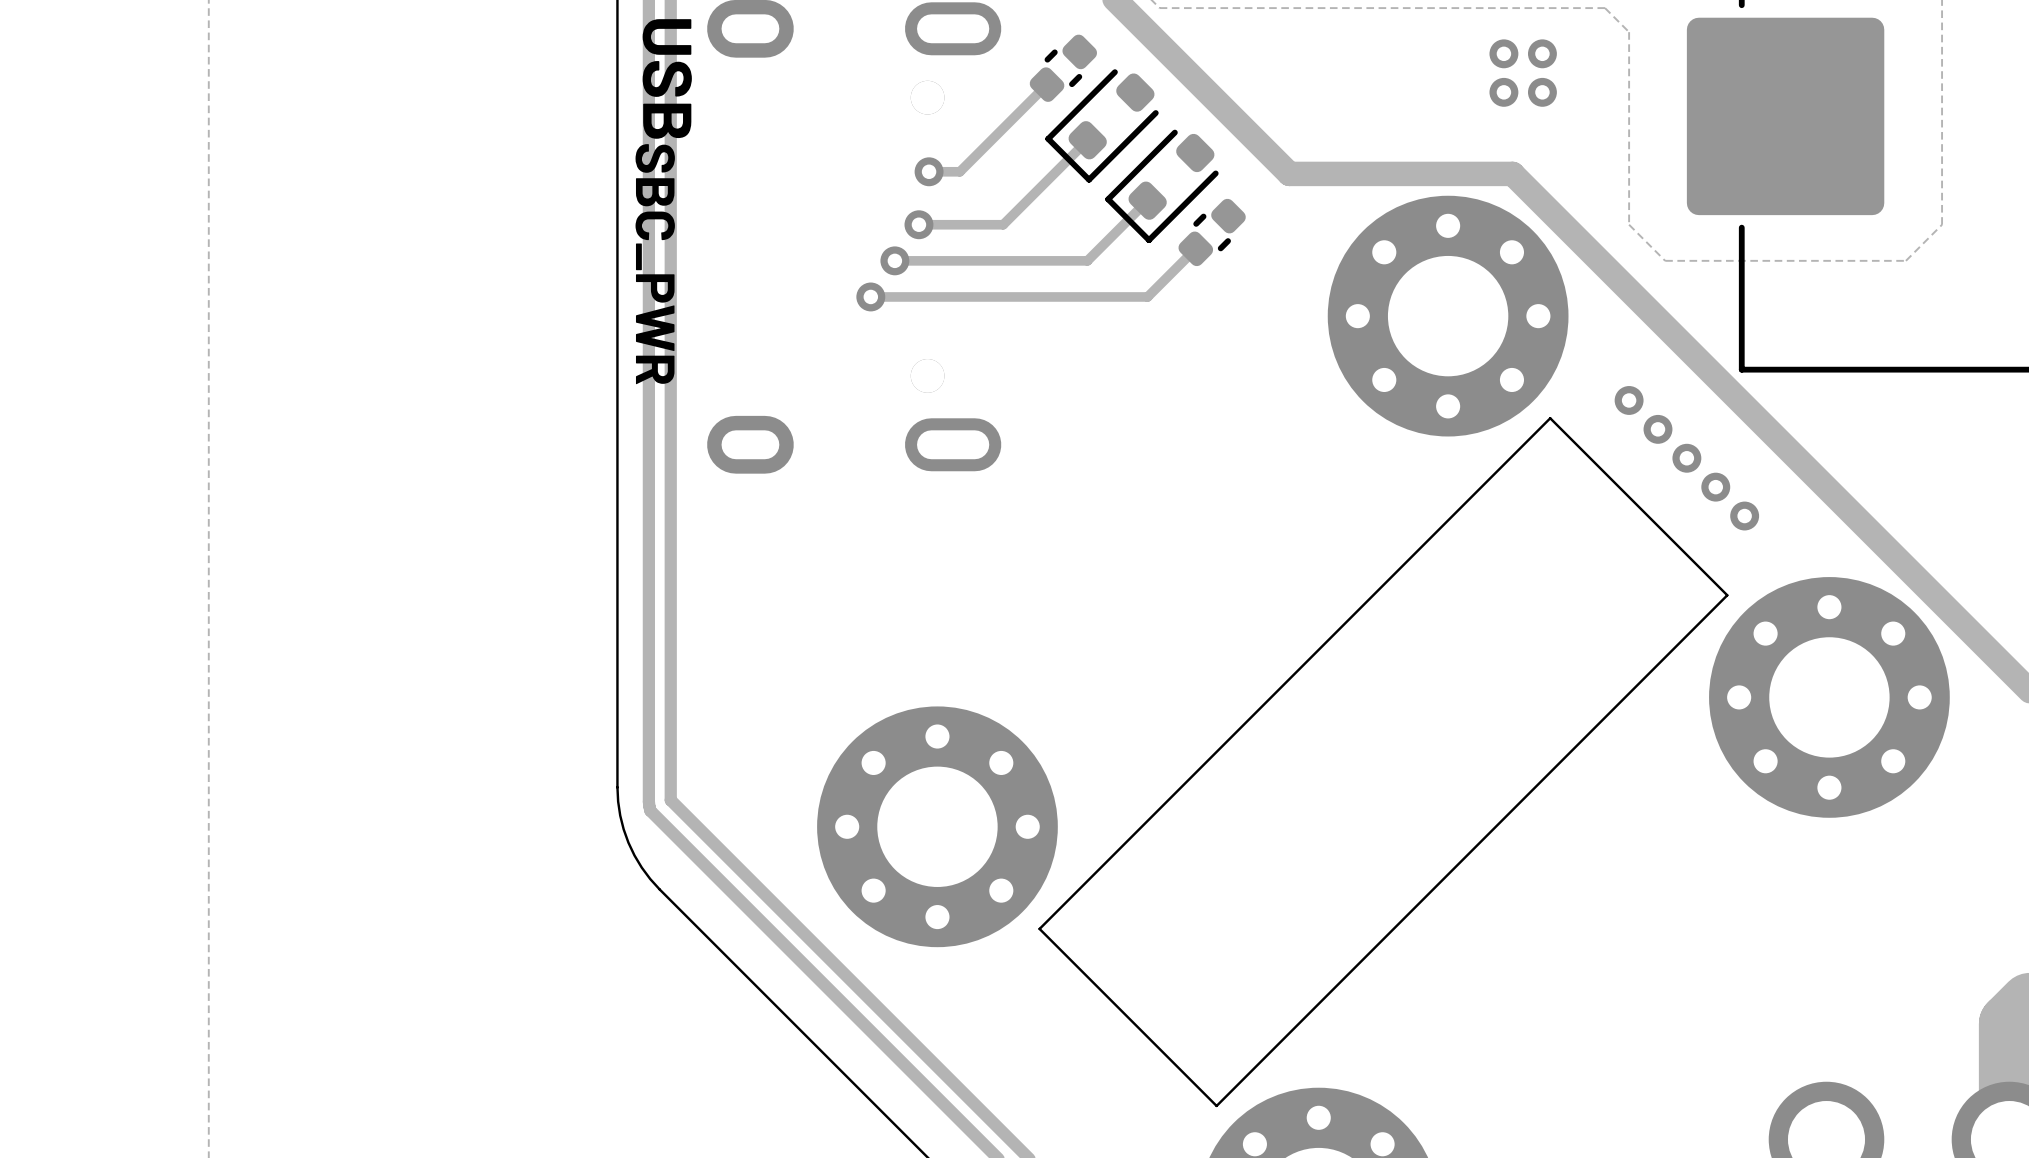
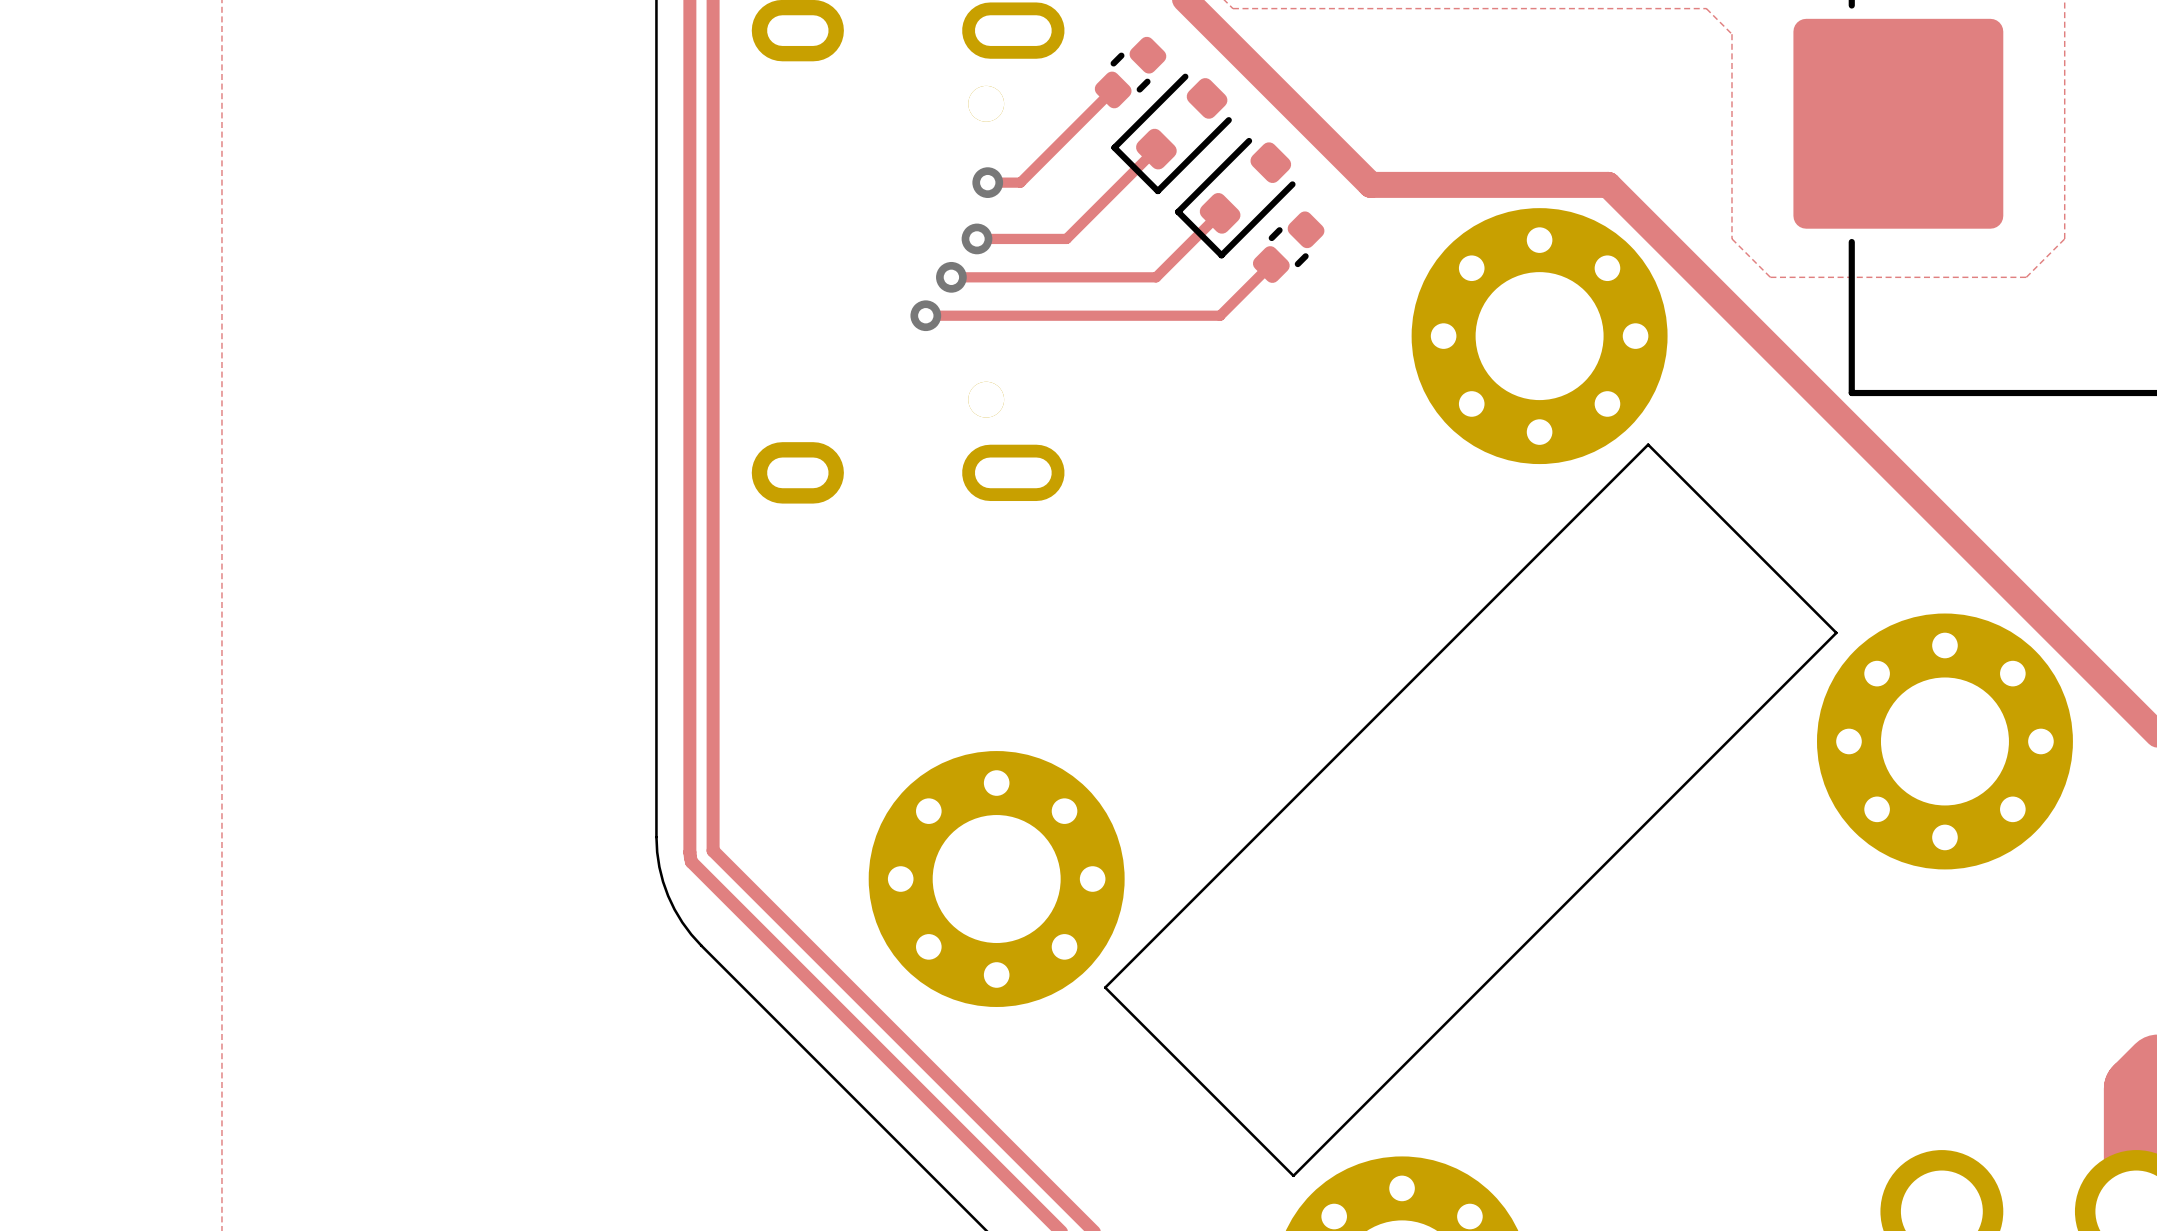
via: (1503, 53) -> none
via: (1542, 53) -> none
via: (1503, 92) -> none
via: (1542, 92) -> none
text: USBSBC_PWR (663, 201) -> none
via: (1629, 400) -> none
via: (1657, 429) -> none
via: (1686, 458) -> none
via: (1715, 487) -> none
via: (1744, 516) -> none

